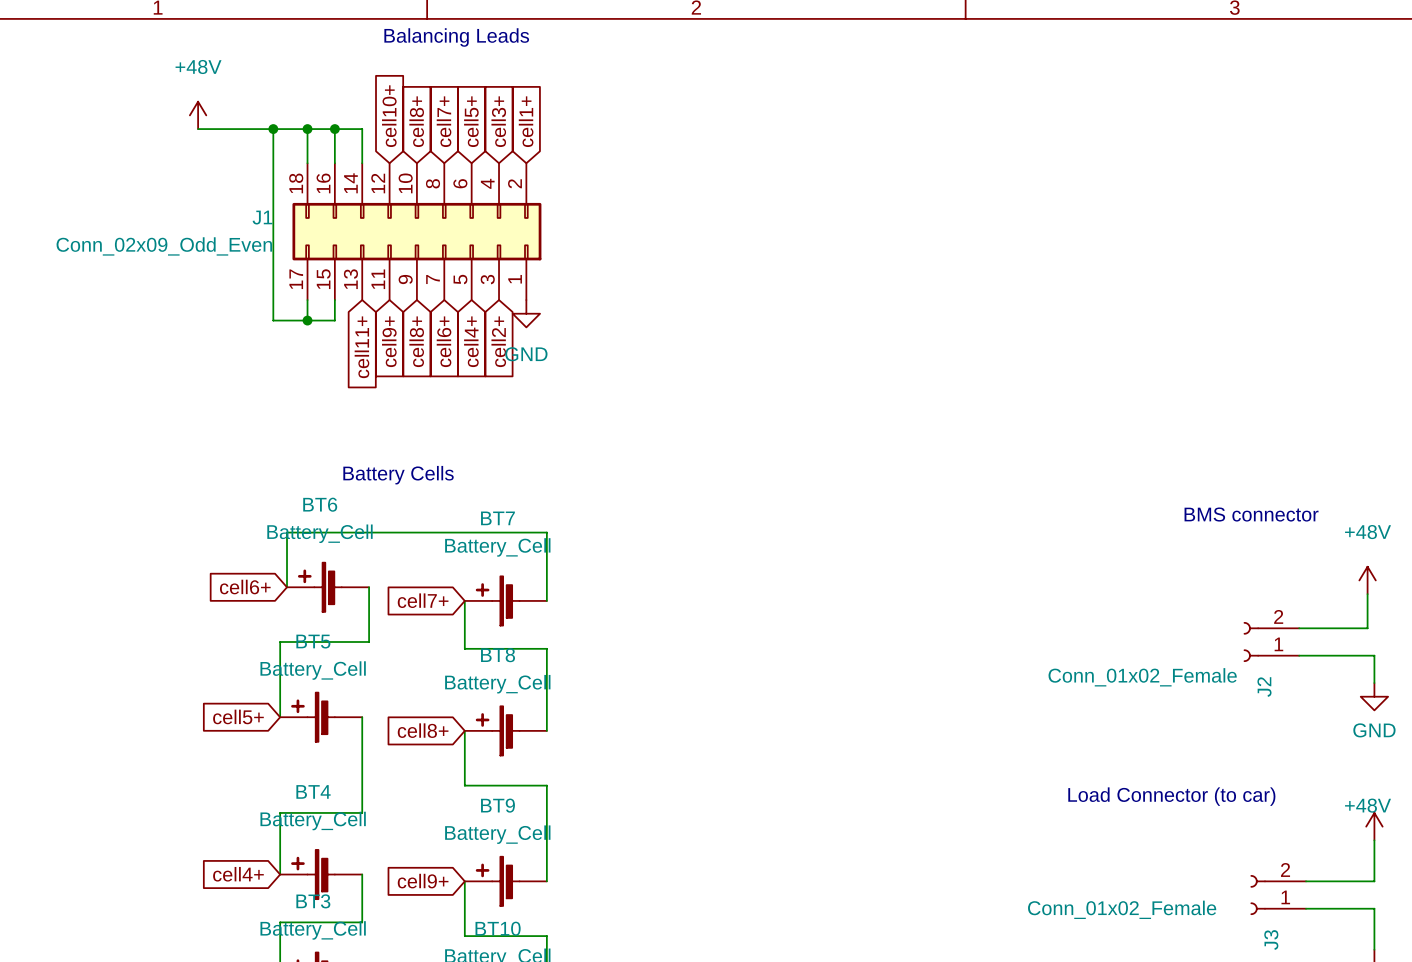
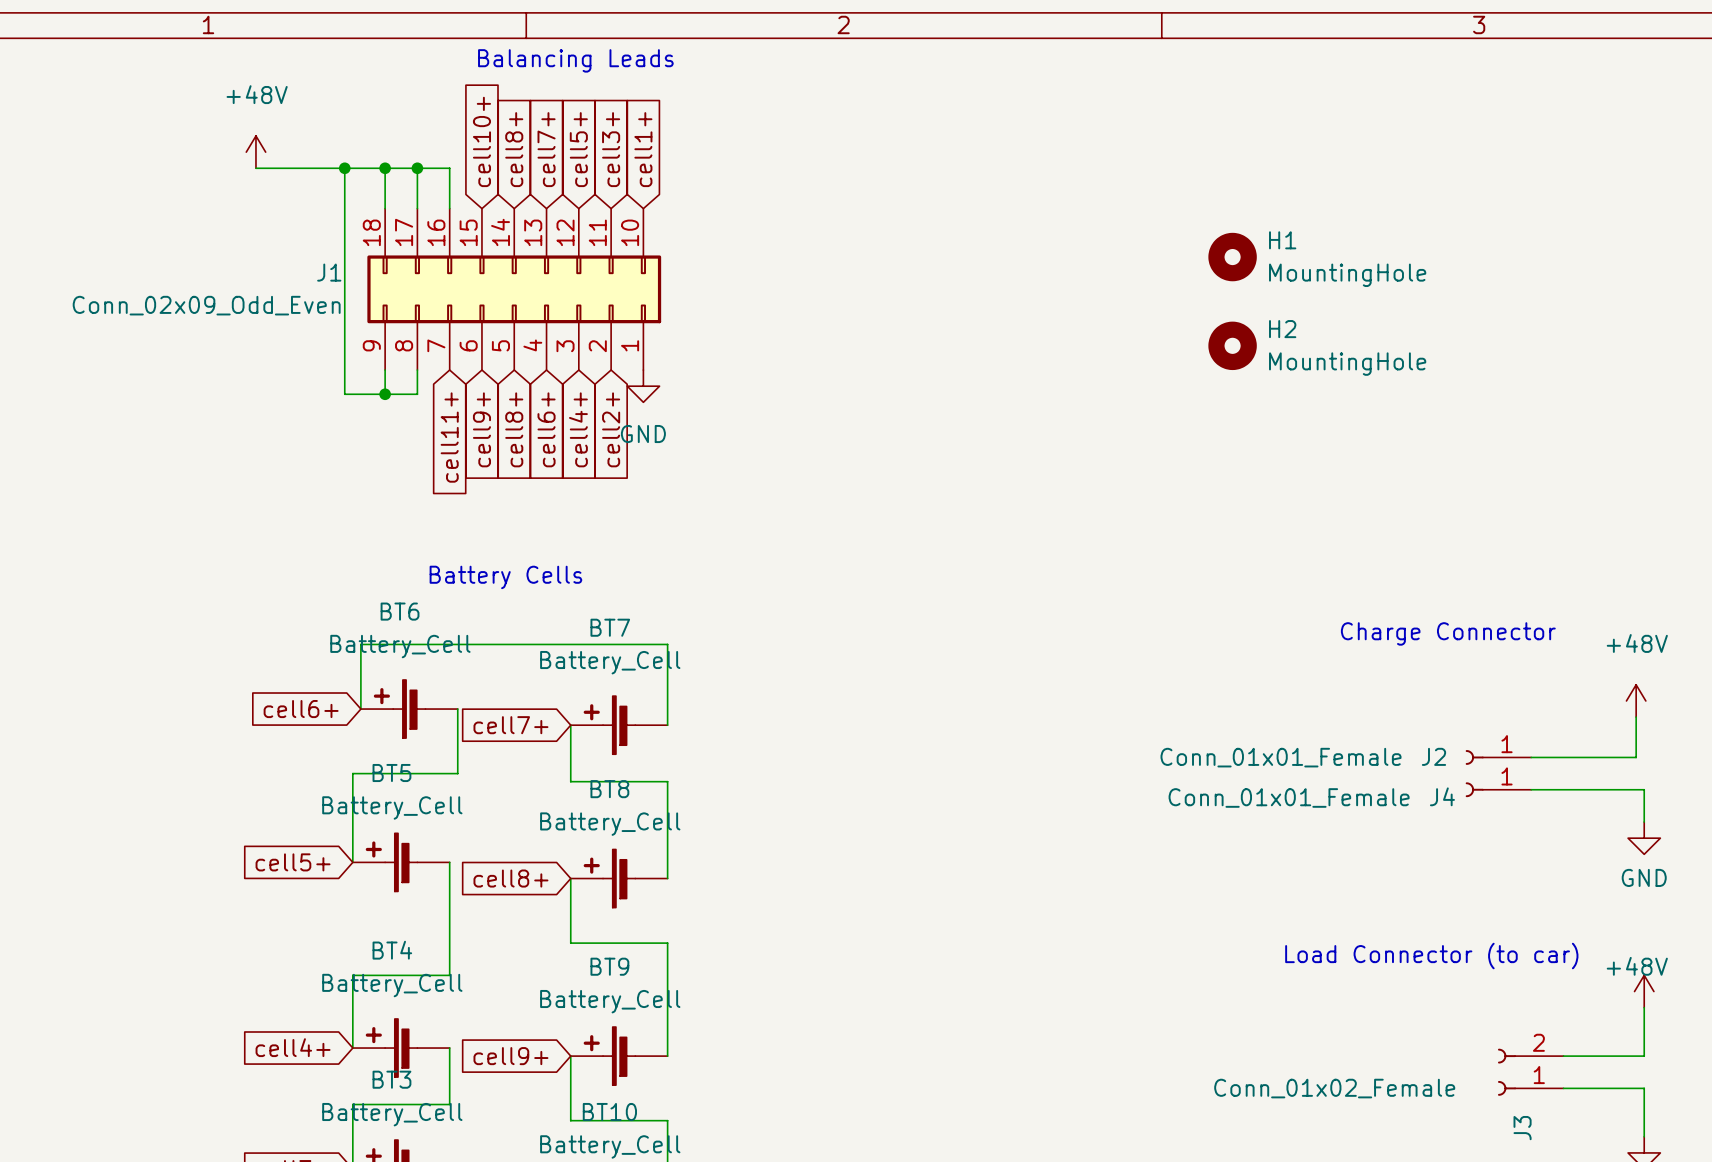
J1 symbol: [292, 163, 542, 301] -> [367, 208, 662, 371]
H1: none -> MountingHole (1232, 257)
H2: none -> MountingHole (1232, 345)
text: BMS connector (1251, 514) -> Charge Connector (1448, 633)
J2 symbol: [1243, 622, 1300, 662] -> [1465, 750, 1532, 765]
J4: none -> Conn_01x01_Female (1498, 789)
J2 value: Conn_01x02_Female (1142, 677) -> Conn_01x01_Female (1281, 757)
J2 name position: J2 (1264, 687) -> J2 (1433, 756)

